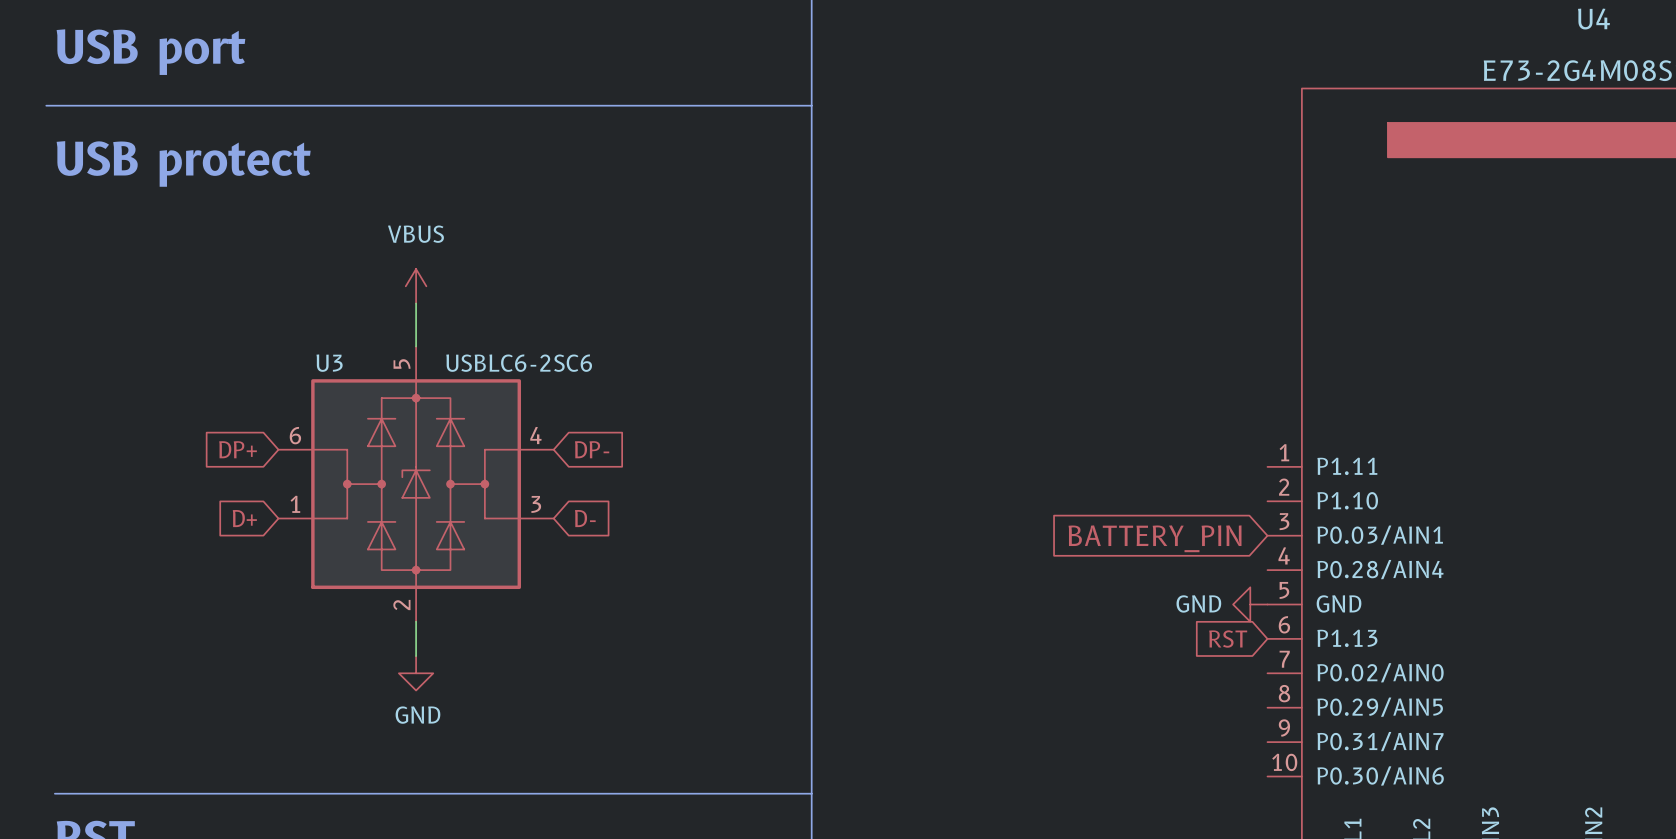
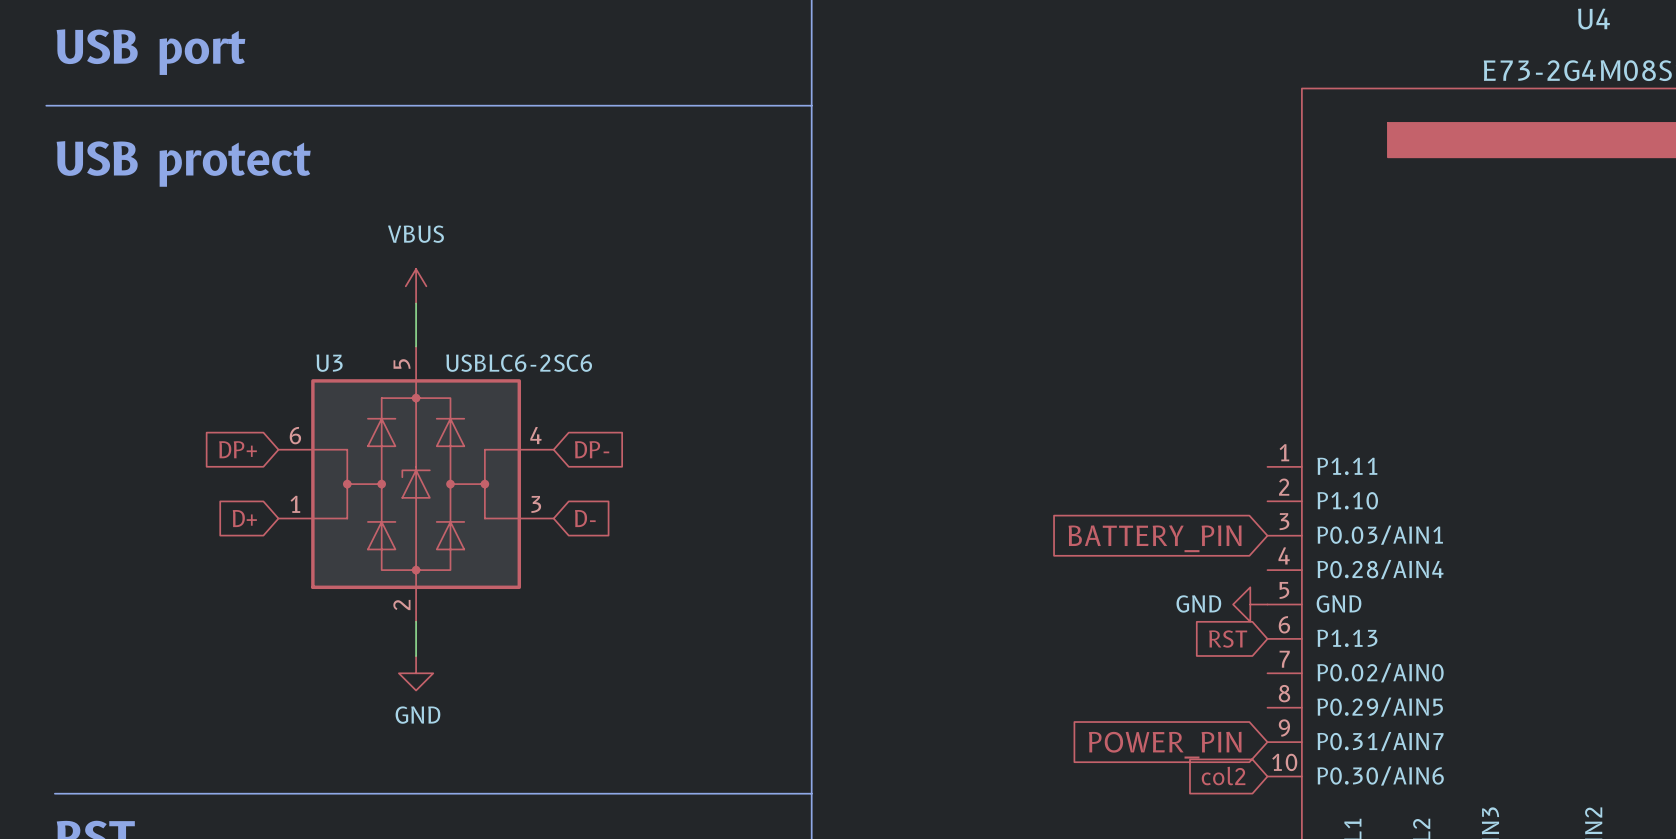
global label: none -> POWER_PIN (1165, 745)
global label: none -> col2 (1223, 776)

